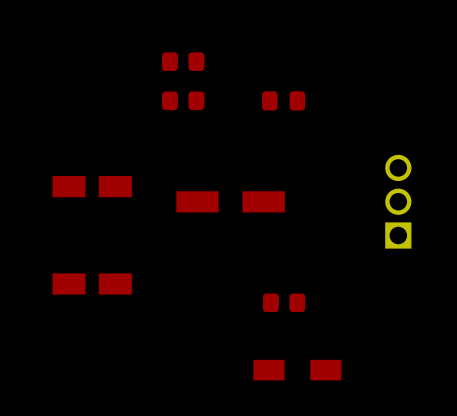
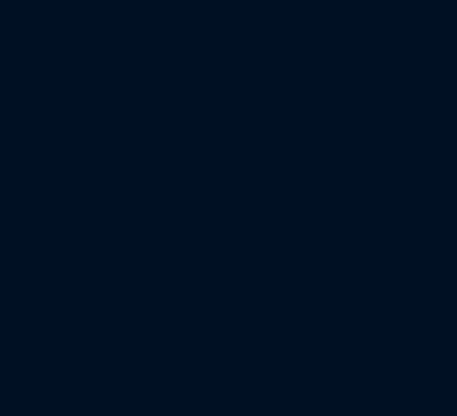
part: (183, 61) -> none
part: (183, 100) -> none
part: (283, 100) -> none
part: (92, 186) -> none
part: (230, 201) -> none
part: (398, 201) -> none
part: (92, 283) -> none
part: (284, 302) -> none
part: (297, 370) -> none

